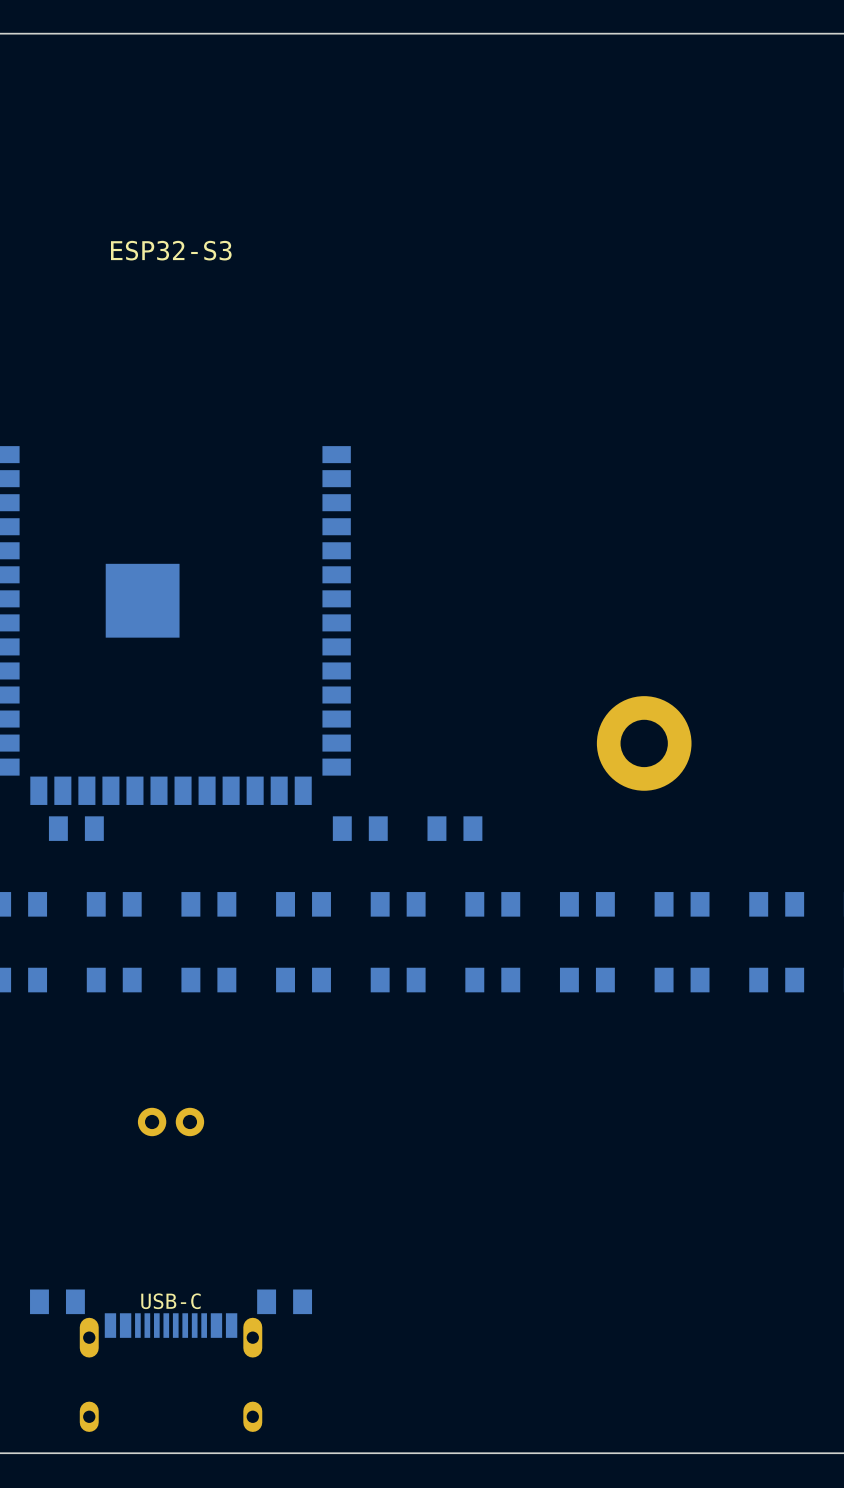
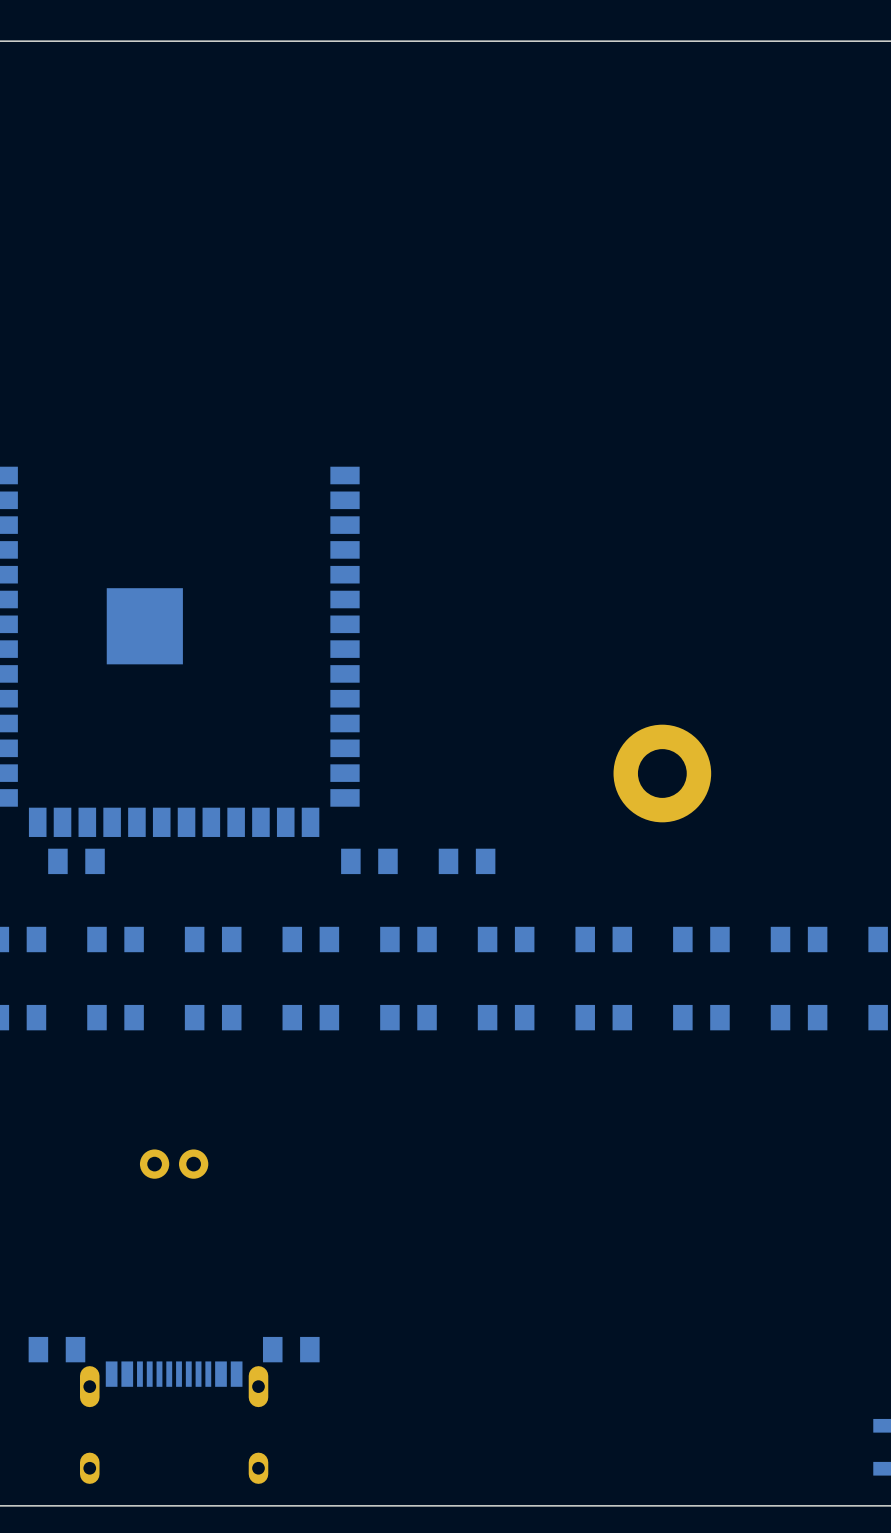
text: ESP32-S3 (171, 250) -> none
text: USB-C (170, 1301) -> none

